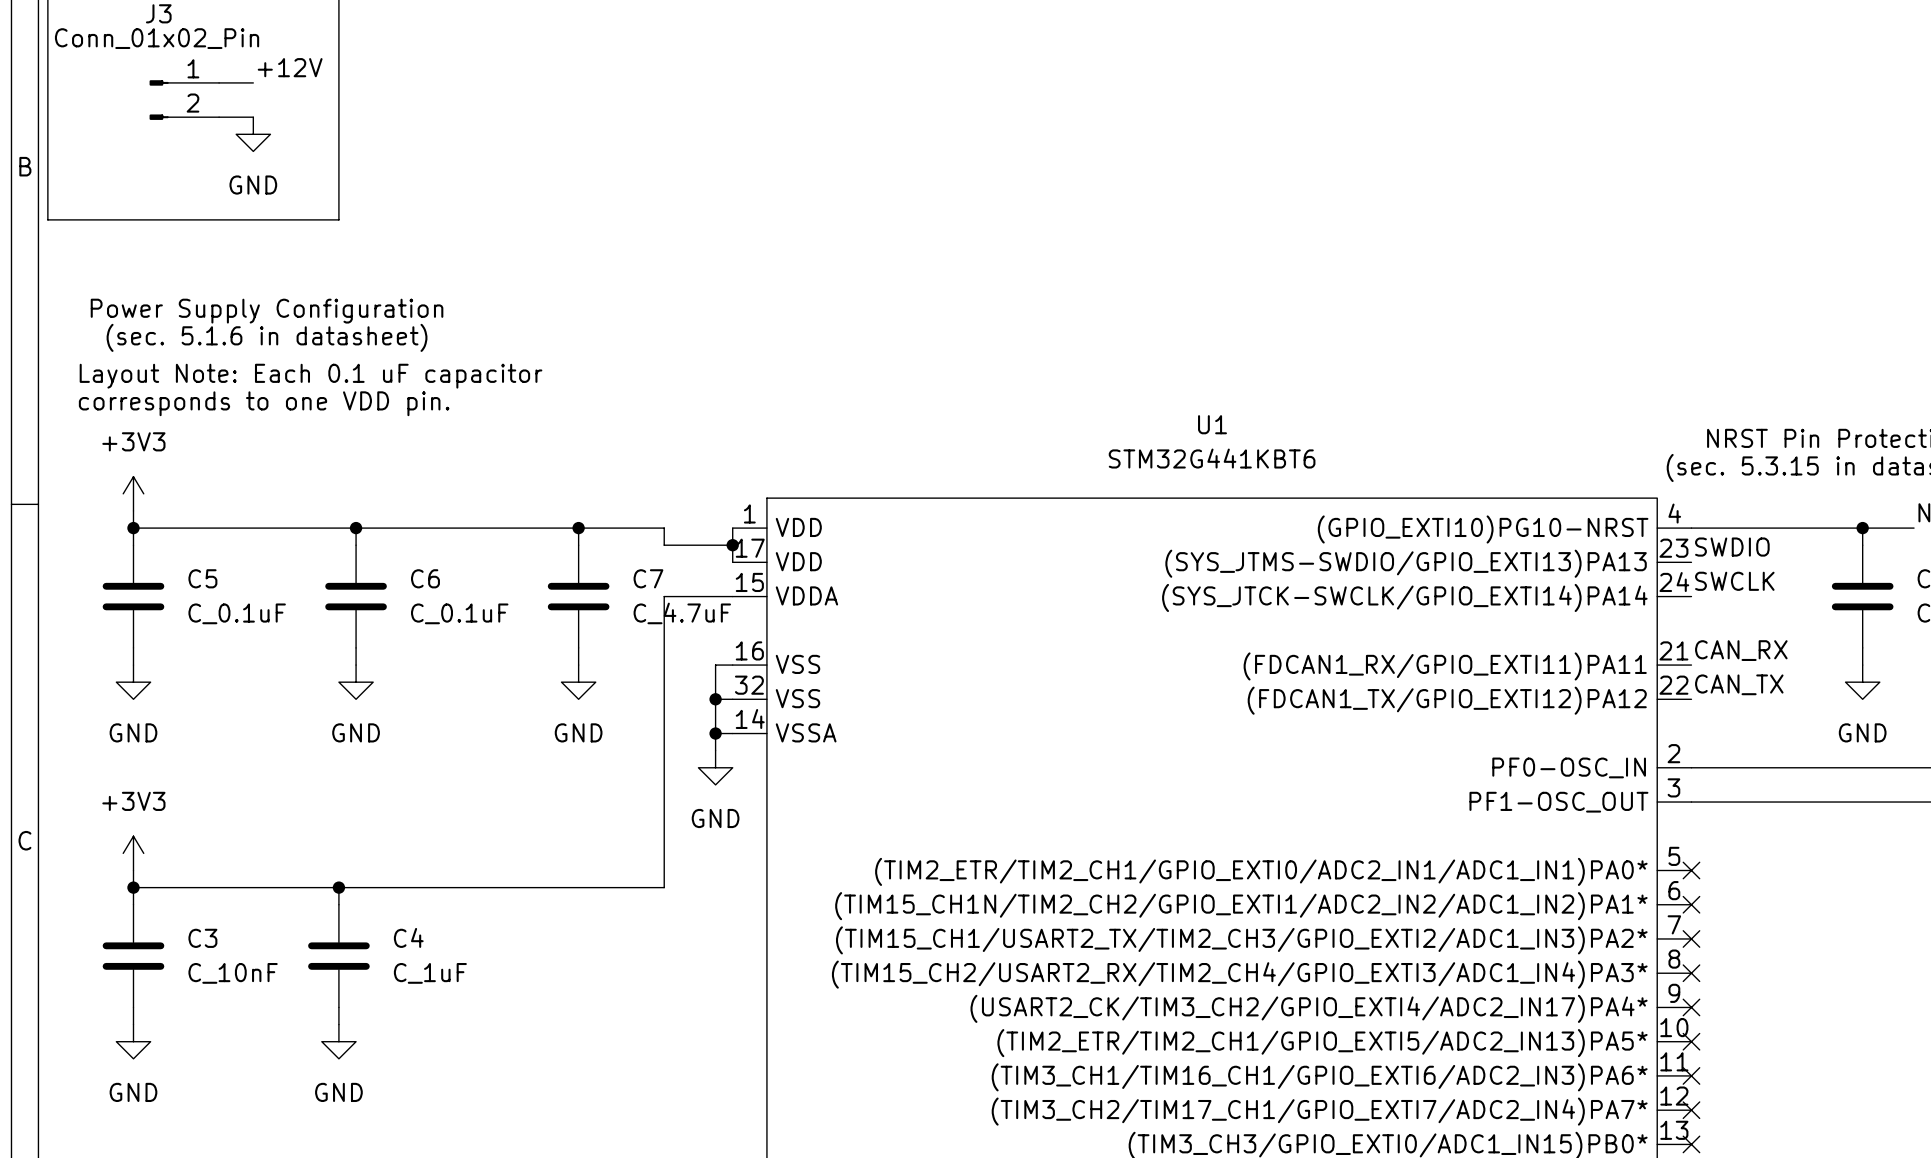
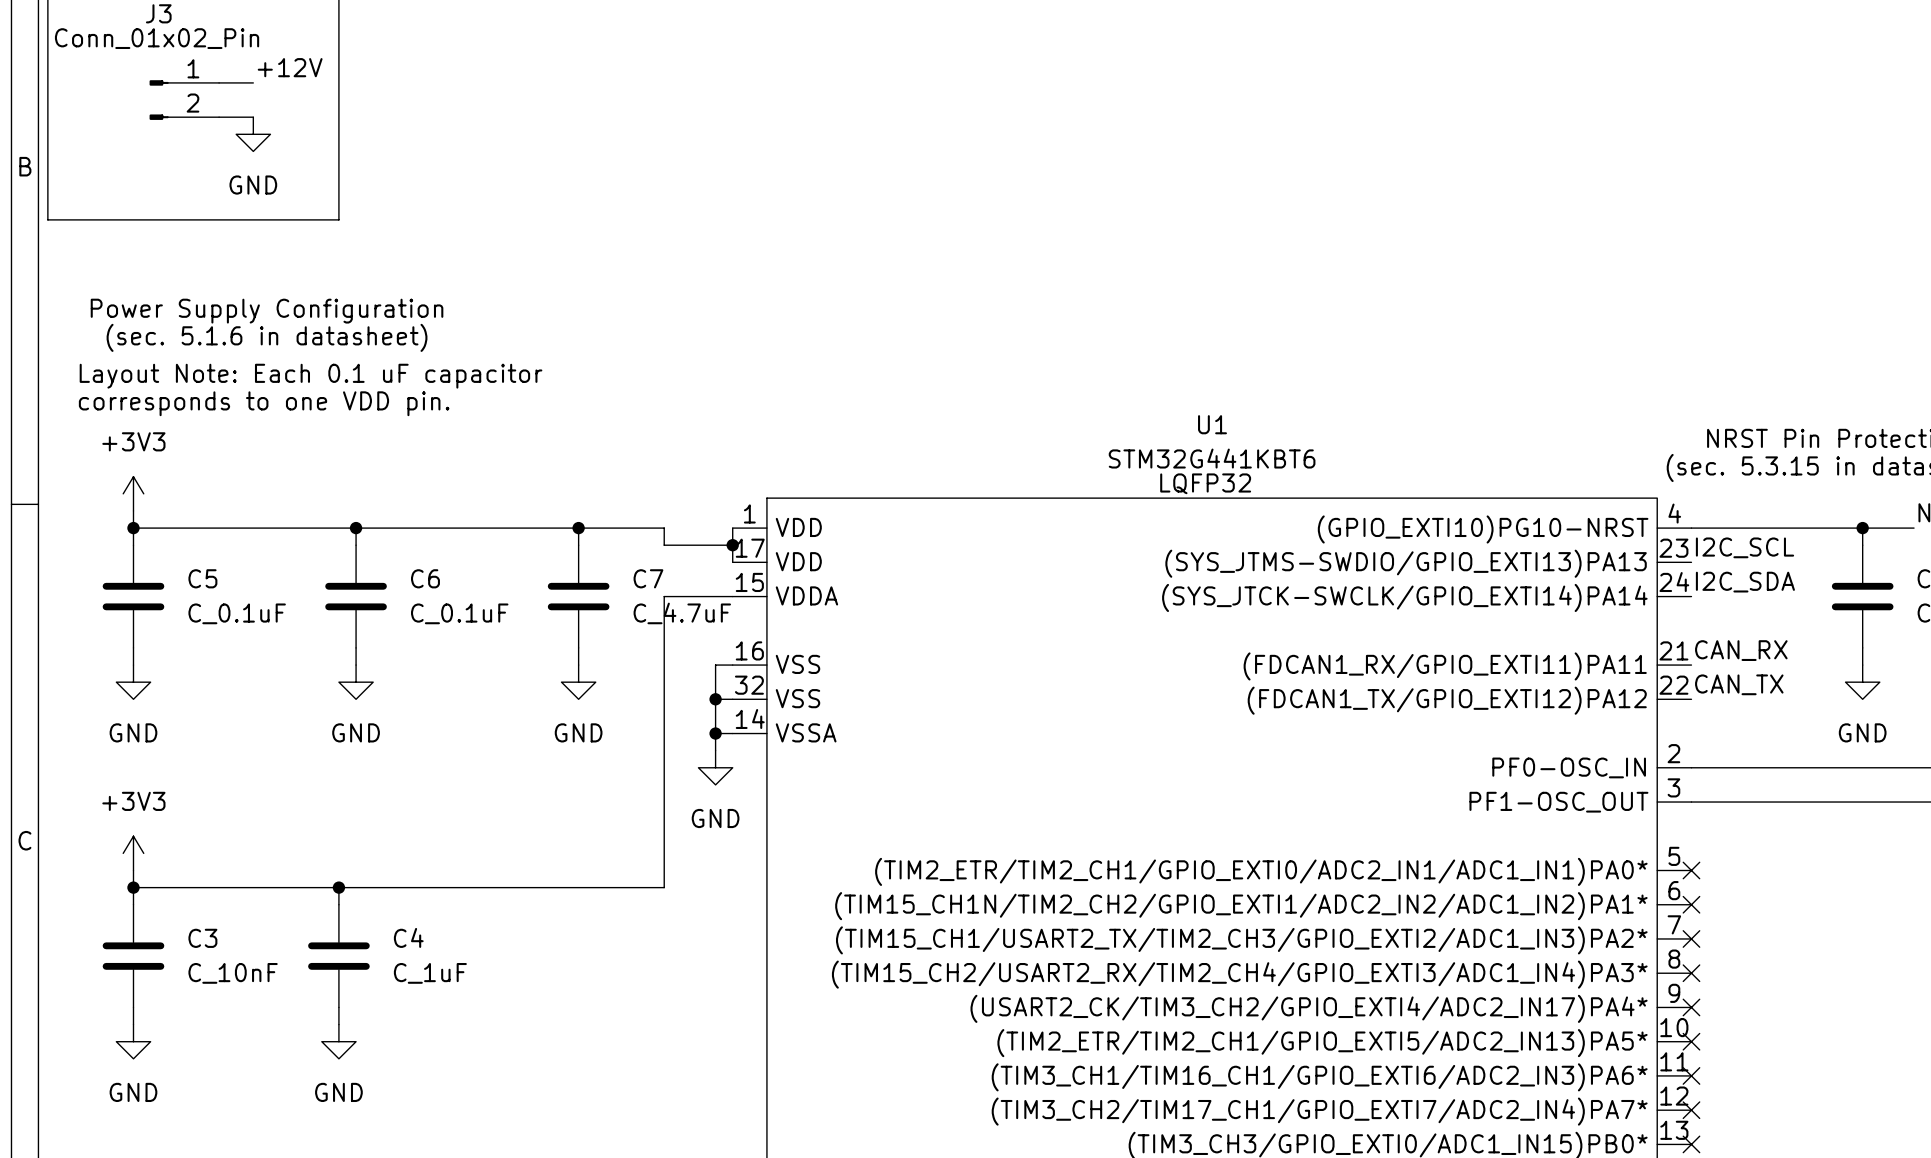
text: none -> LQFP32 (1205, 483)
label: SWDIO (1732, 547) -> I2C_SCL (1745, 547)
label: SWCLK (1734, 581) -> I2C_SDA (1745, 582)

